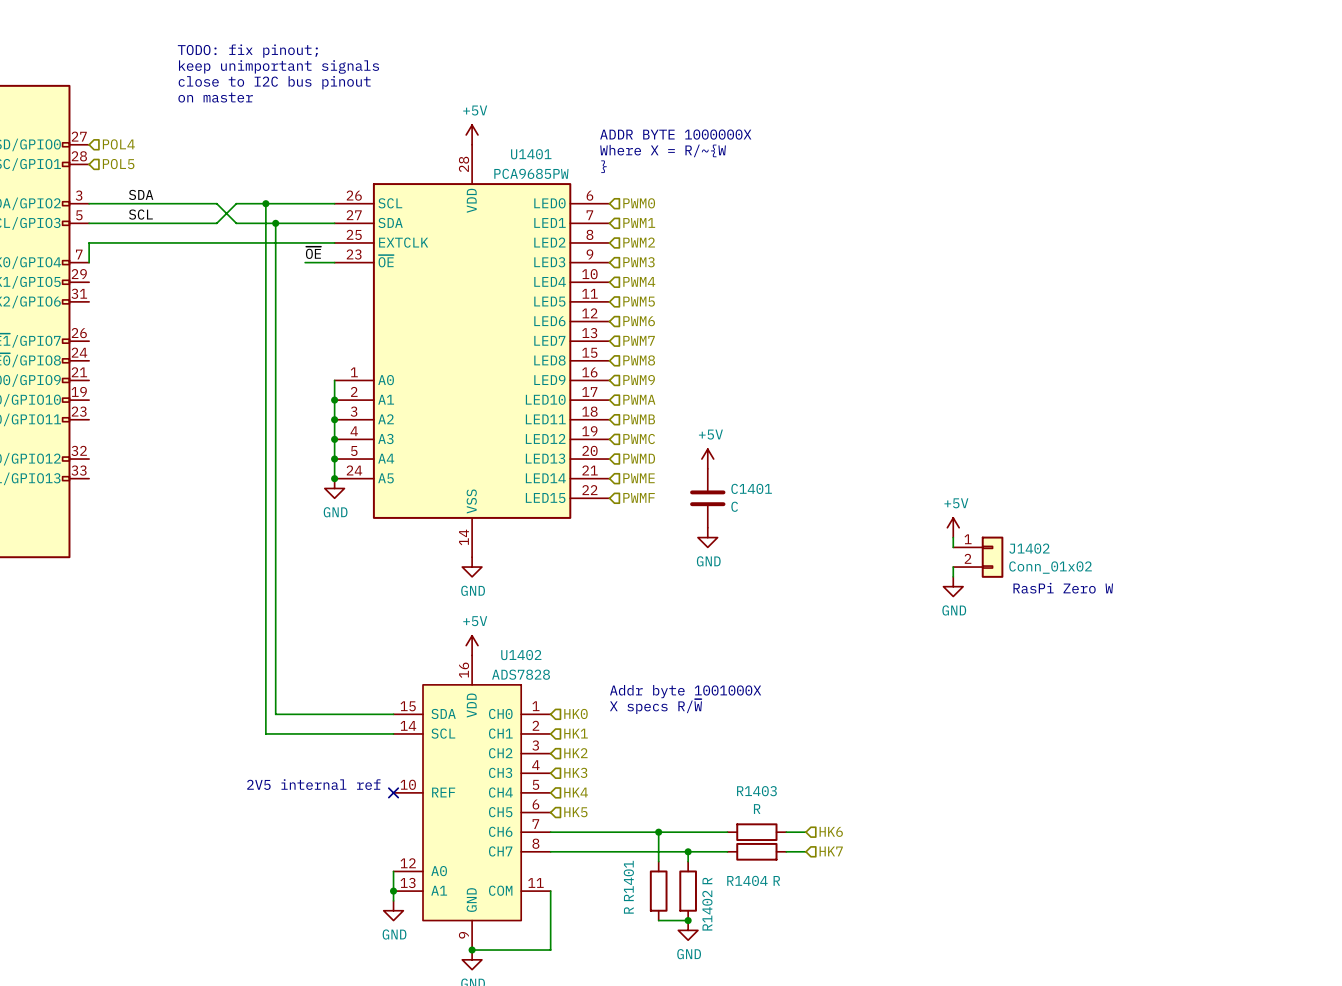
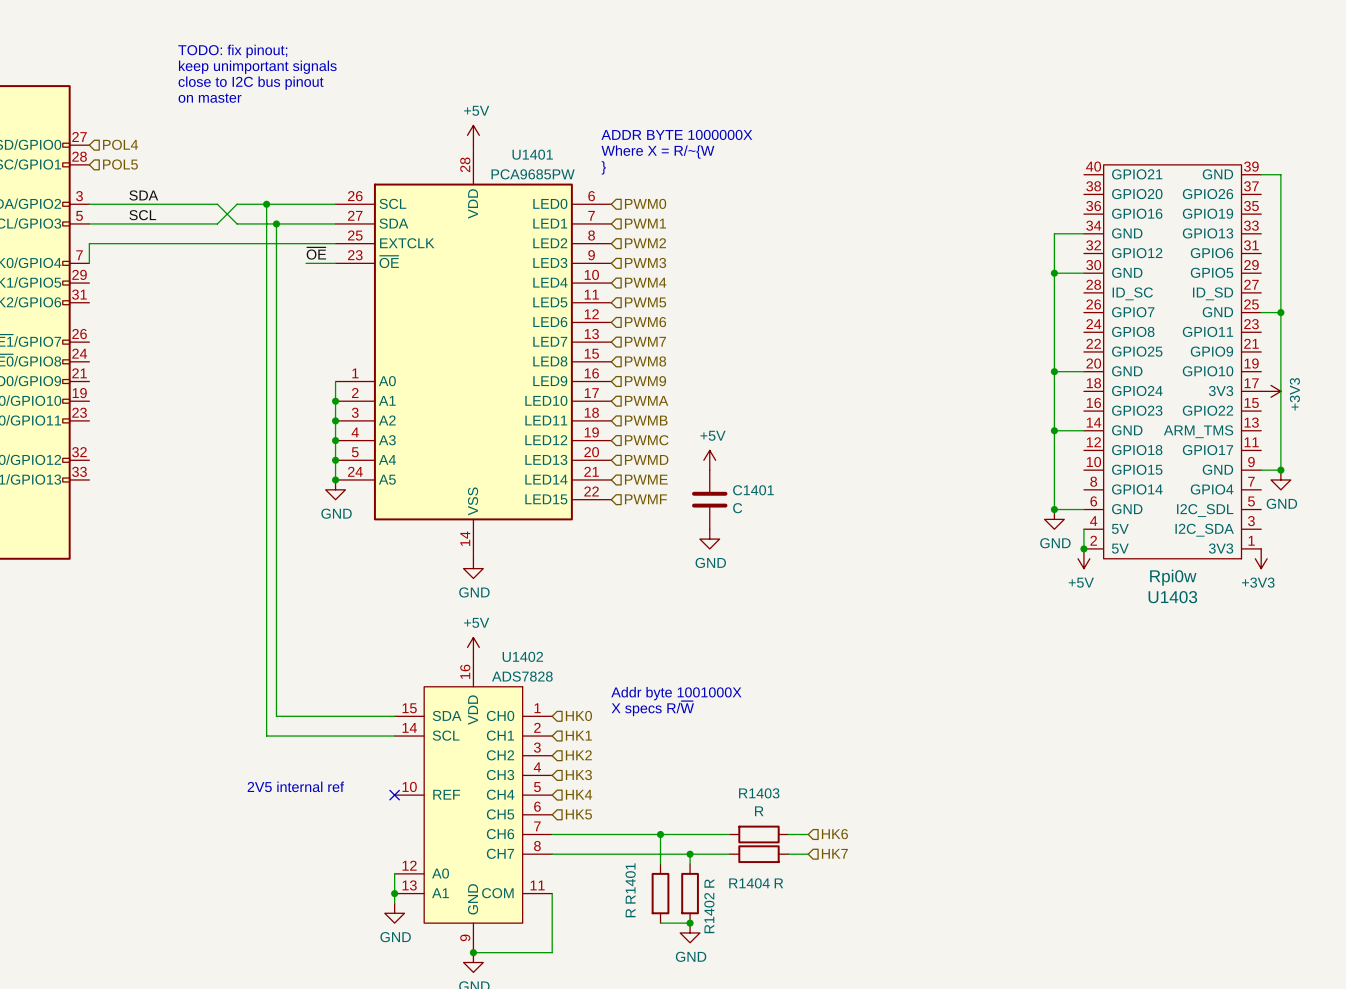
wire: none -> (1261, 174) (1280, 174) (1280, 470) (1261, 470)
wire: none -> (1083, 233) (1054, 233) (1054, 509) (1083, 509)
wire: none -> (1054, 273) (1083, 273)
junction: none -> (1054, 273)
wire: none -> (1261, 312) (1280, 312)
junction: none -> (1280, 312)
U1403: none -> Rpi0w (1172, 361)
wire: none -> (1054, 371) (1083, 371)
junction: none -> (1054, 371)
power symbol: none -> +3V3 (1271, 391)
wire: none -> (1054, 430) (1083, 430)
junction: none -> (1054, 430)
junction: none -> (1280, 470)
power symbol: none -> GND (1280, 479)
junction: none -> (1054, 509)
power symbol rotation: 0° (953, 527) -> 180° (1083, 558)
power symbol position: +5V (953, 527) -> +5V (1083, 558)
wire: none -> (1083, 529) (1083, 548)
wire: (953, 537) (953, 547) -> none
junction: none -> (1083, 548)
J1402: Conn_01x02 (978, 557) -> none
power symbol: none -> +3V3 (1261, 558)
wire: (953, 567) (953, 576) -> none
power symbol position: GND (953, 586) -> GND (1054, 519)
text: RasPi Zero W (1063, 588) -> none

